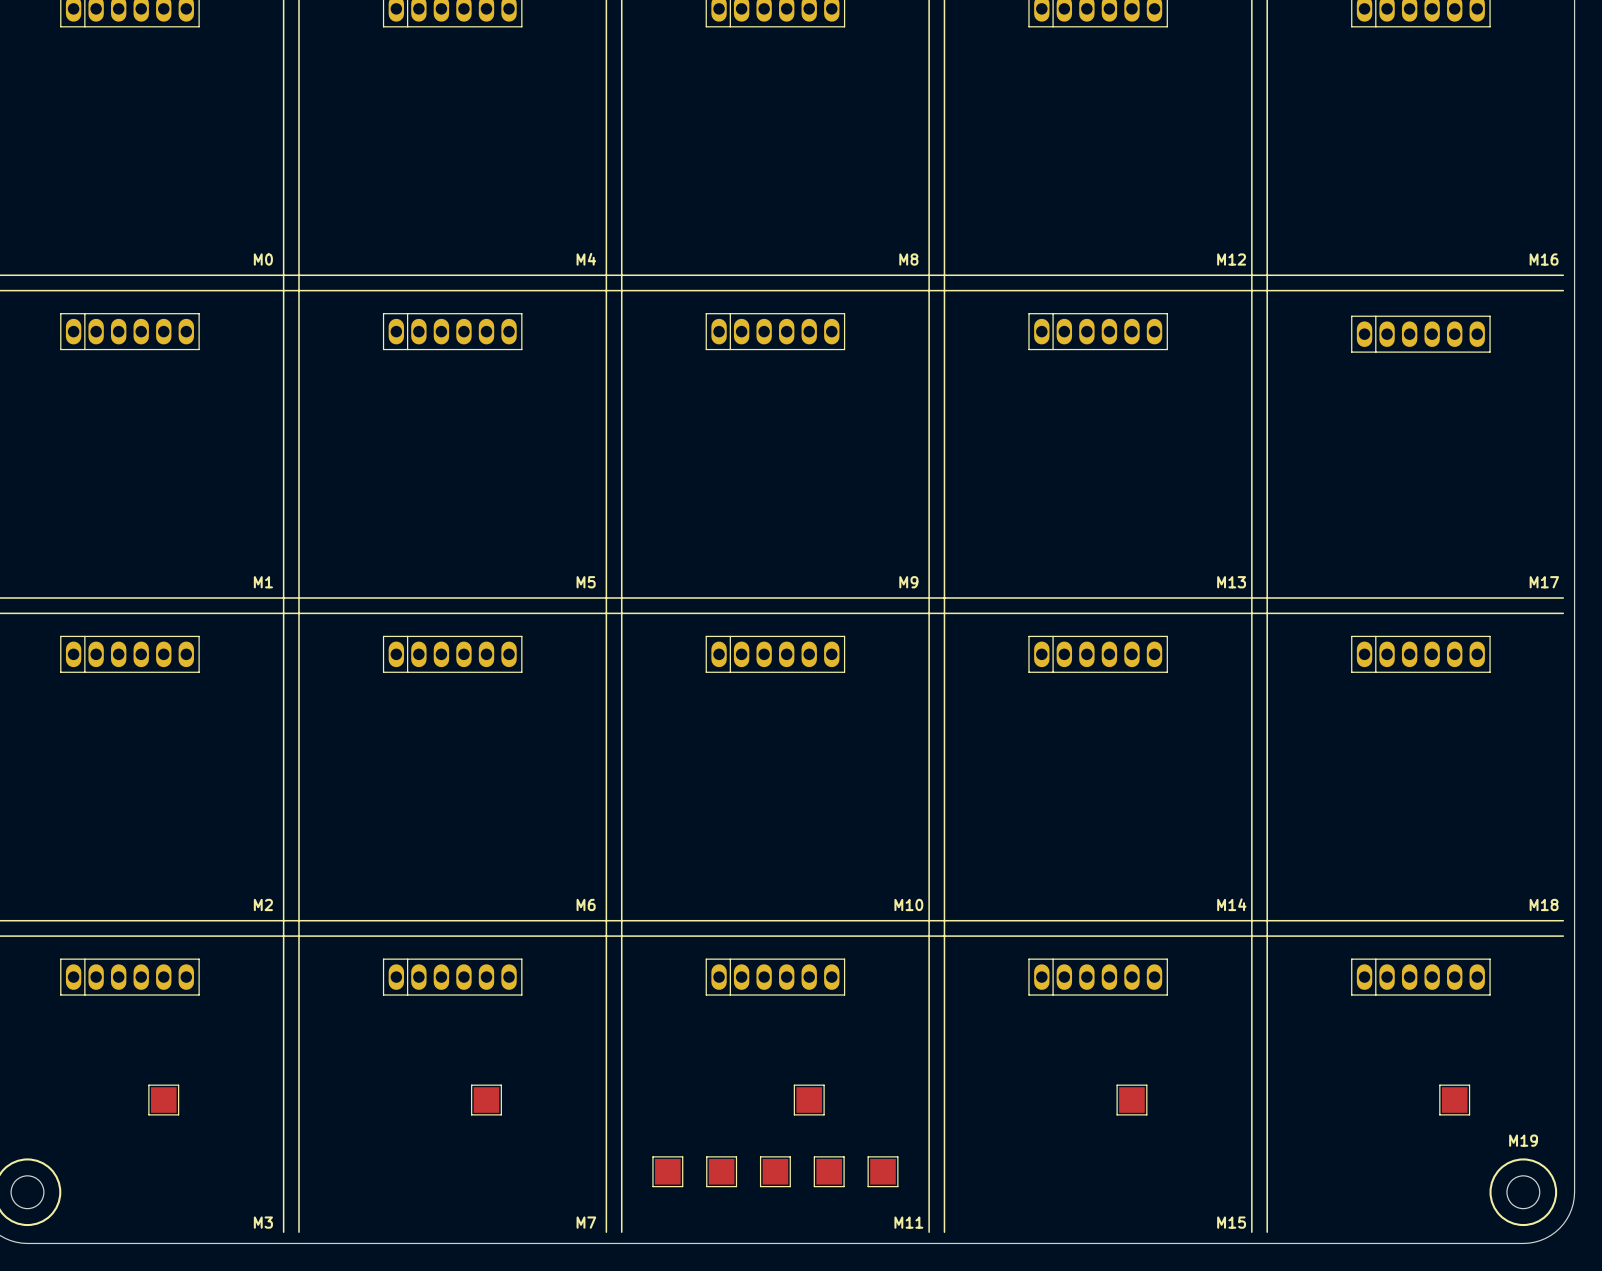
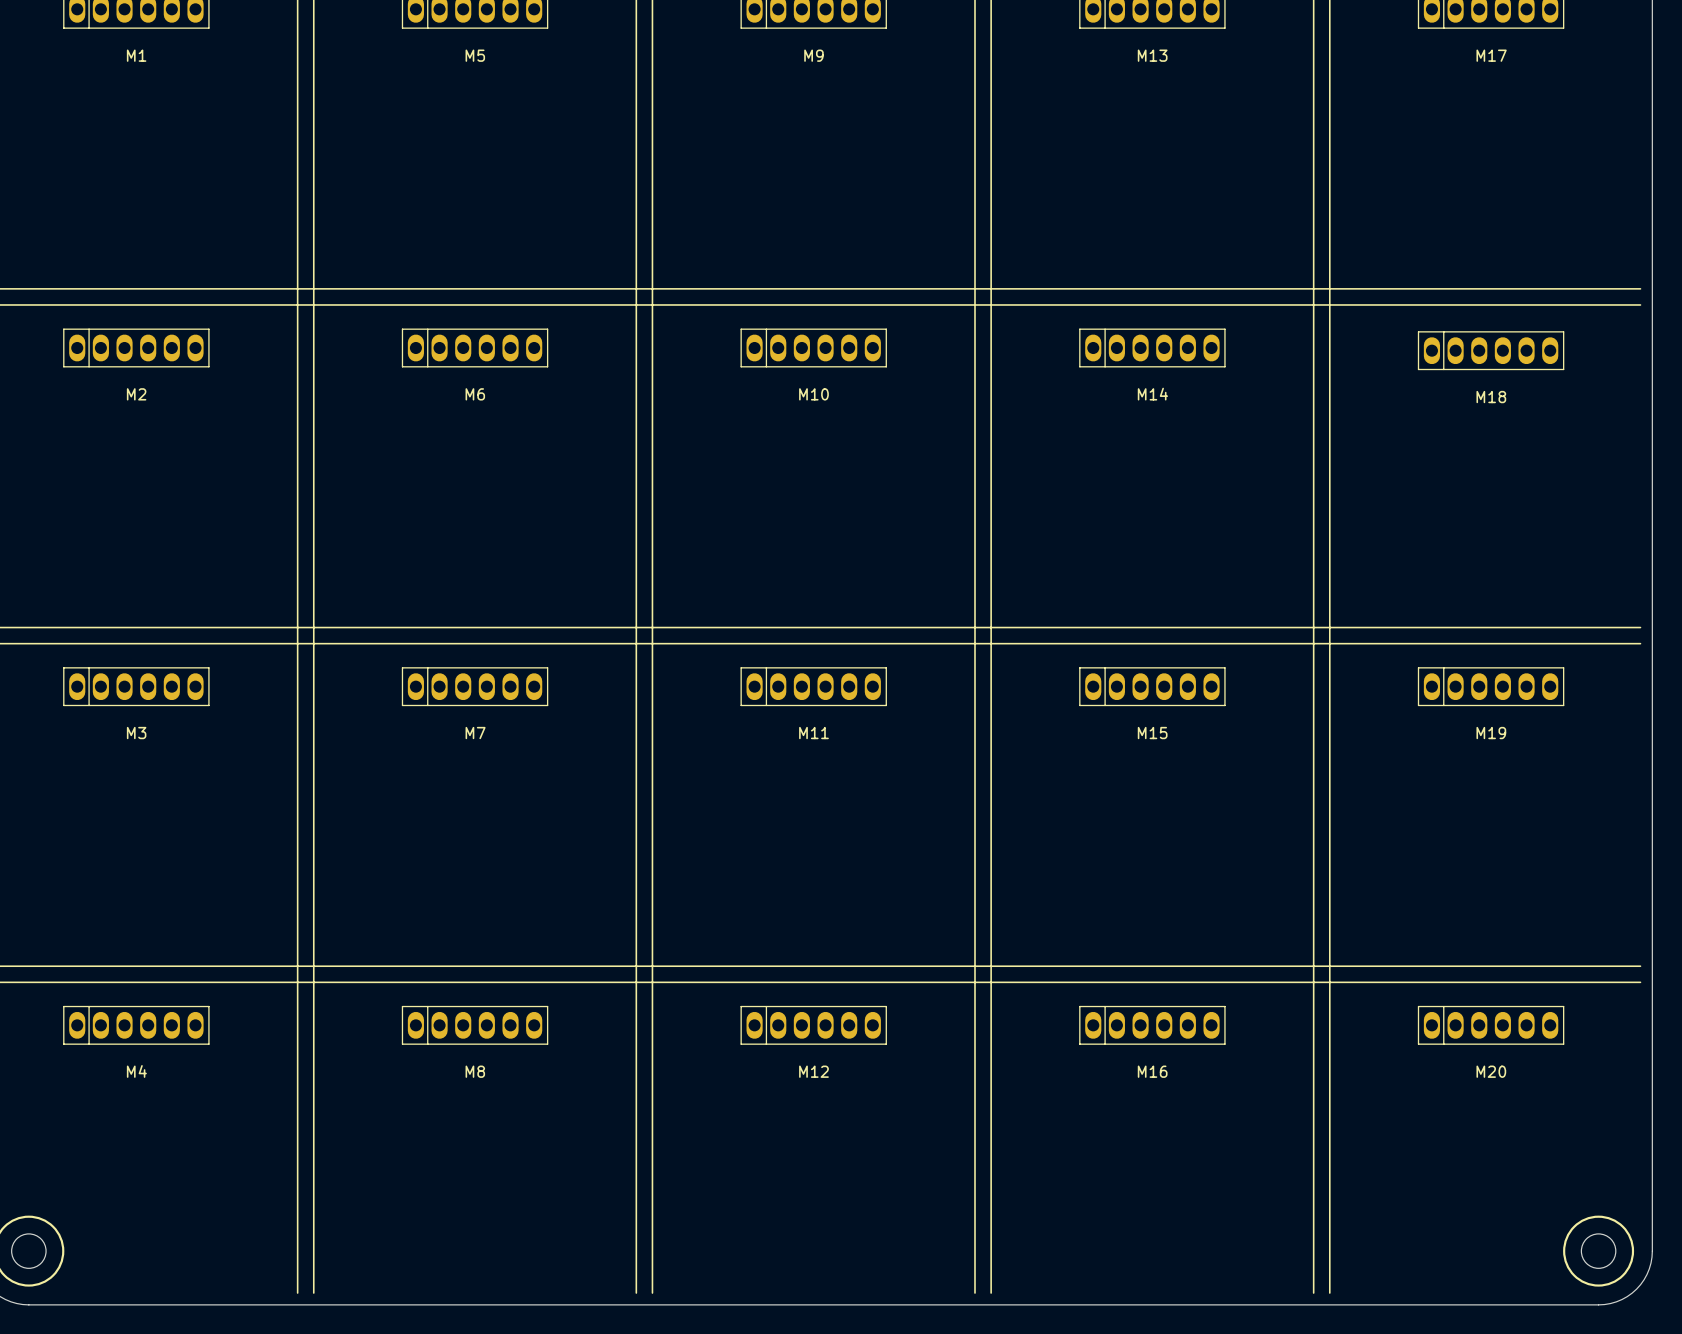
M0 name: M0 (263, 259) -> M1 (136, 55)
M4 name: M4 (586, 259) -> M5 (475, 55)
M8 name: M8 (908, 259) -> M9 (813, 55)
M12 name: M12 (1231, 259) -> M13 (1152, 55)
M16 name: M16 (1544, 259) -> M17 (1491, 55)
M1 name: M1 (263, 582) -> M2 (136, 394)
M5 name: M5 (586, 582) -> M6 (475, 394)
M9 name: M9 (908, 582) -> M10 (813, 394)
M13 name: M13 (1231, 582) -> M14 (1152, 394)
M17 name: M17 (1544, 582) -> M18 (1491, 397)
M2 name: M2 (263, 904) -> M3 (136, 733)
M6 name: M6 (586, 904) -> M7 (475, 733)
M10 name: M10 (908, 904) -> M11 (813, 733)
M14 name: M14 (1231, 904) -> M15 (1152, 733)
M18 name: M18 (1544, 904) -> M19 (1491, 733)
part: (163, 1100) -> none
part: (486, 1100) -> none
part: (809, 1100) -> none
part: (1131, 1100) -> none
part: (1454, 1100) -> none
M19 name: M19 (1523, 1140) -> M20 (1491, 1071)
part: (667, 1171) -> none
part: (721, 1171) -> none
part: (775, 1171) -> none
part: (829, 1171) -> none
part: (883, 1171) -> none
M3 name: M3 (263, 1222) -> M4 (136, 1071)
M7 name: M7 (586, 1222) -> M8 (475, 1071)
M11 name: M11 (908, 1222) -> M12 (813, 1071)
M15 name: M15 (1231, 1222) -> M16 (1152, 1071)

